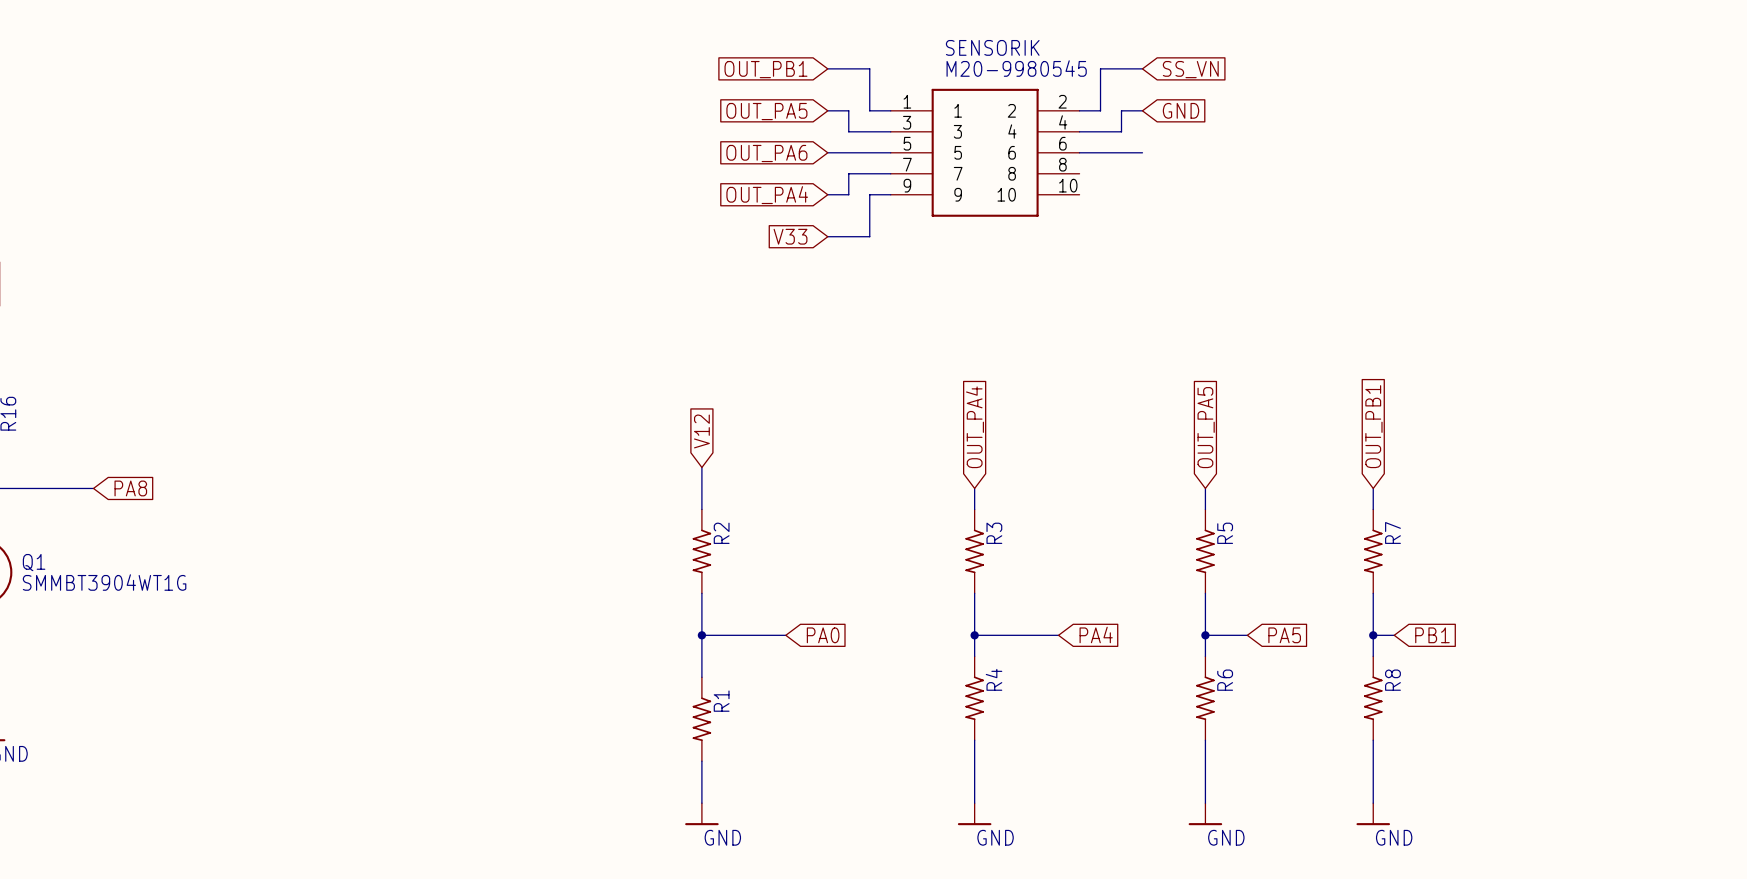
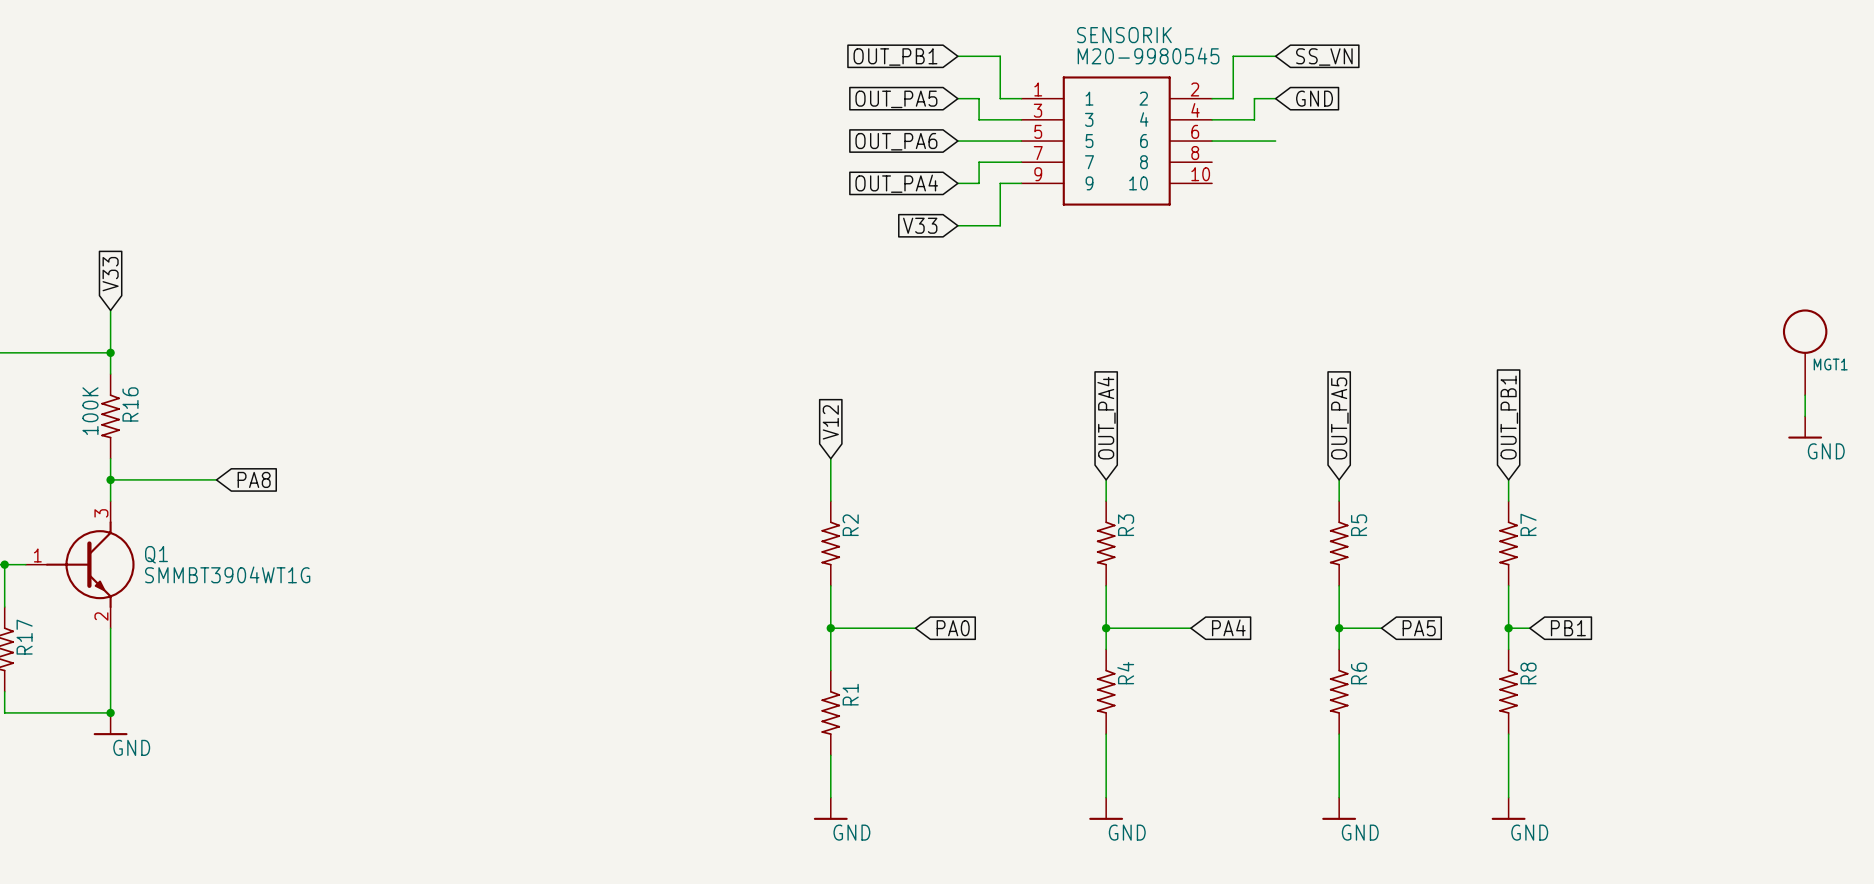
MGT1: none -> (1805, 352)
wire: none -> (1805, 395) (1805, 416)
power symbol: none -> GND (1805, 427)

